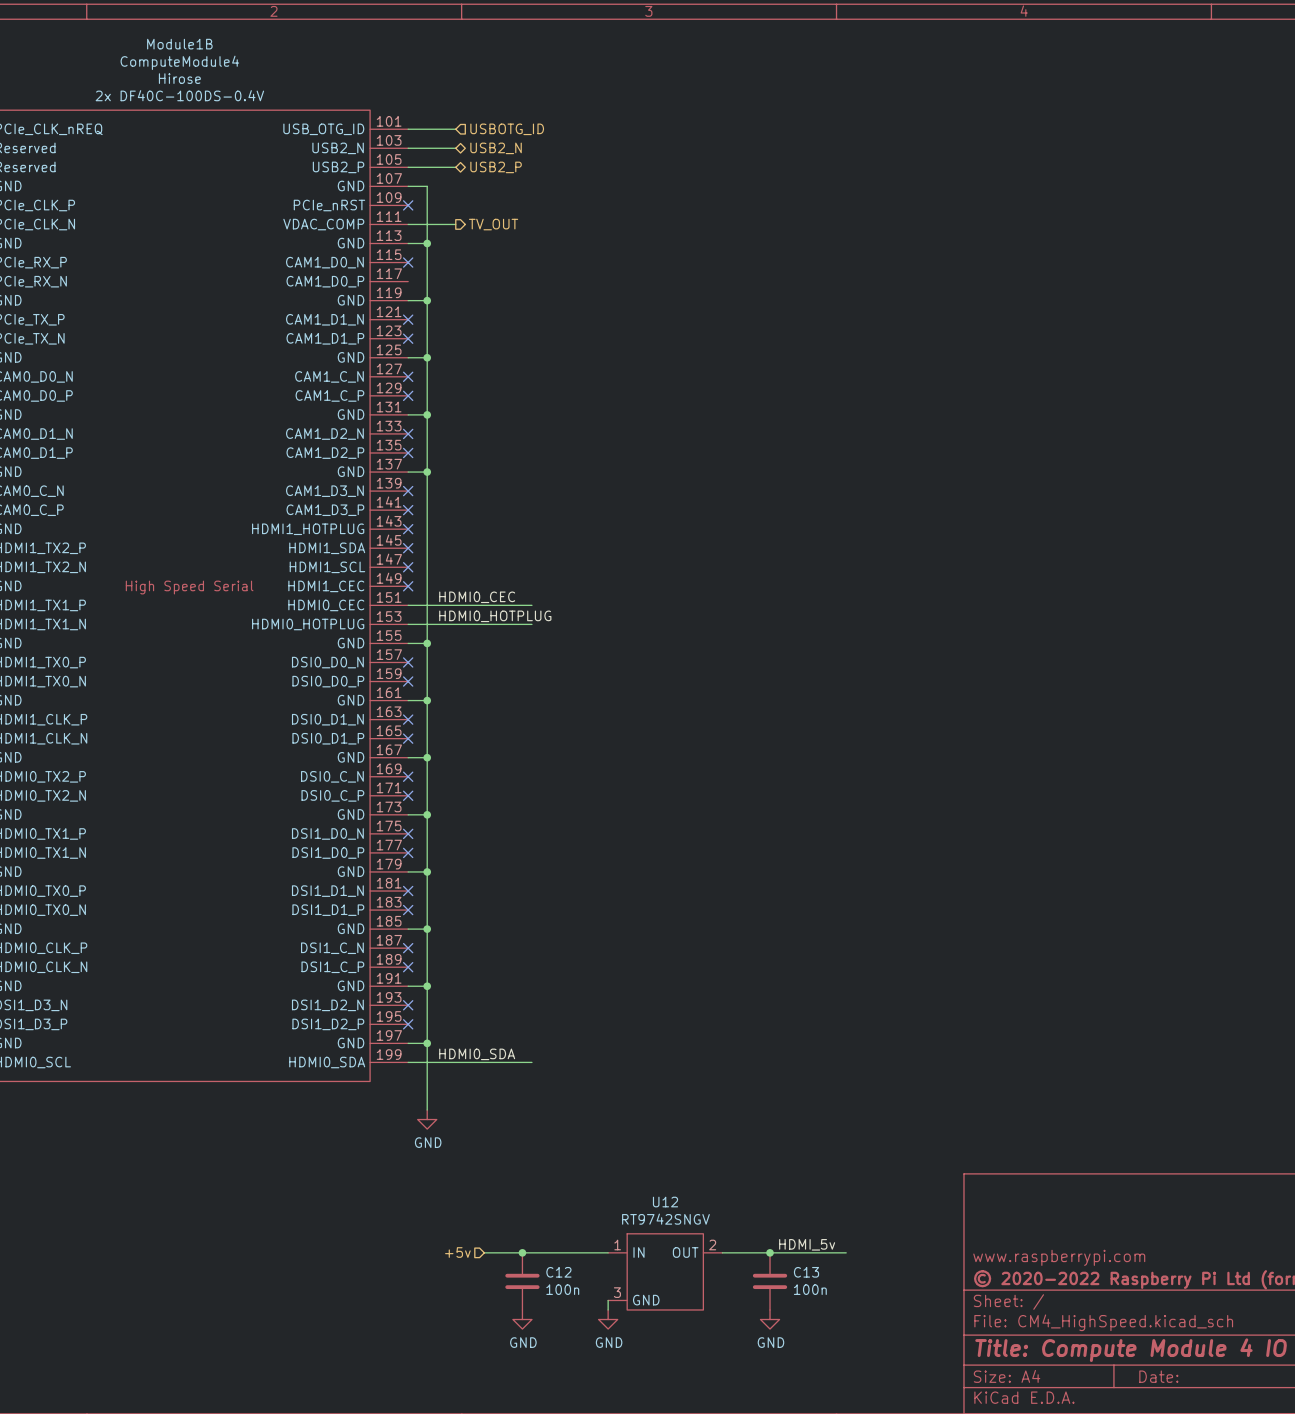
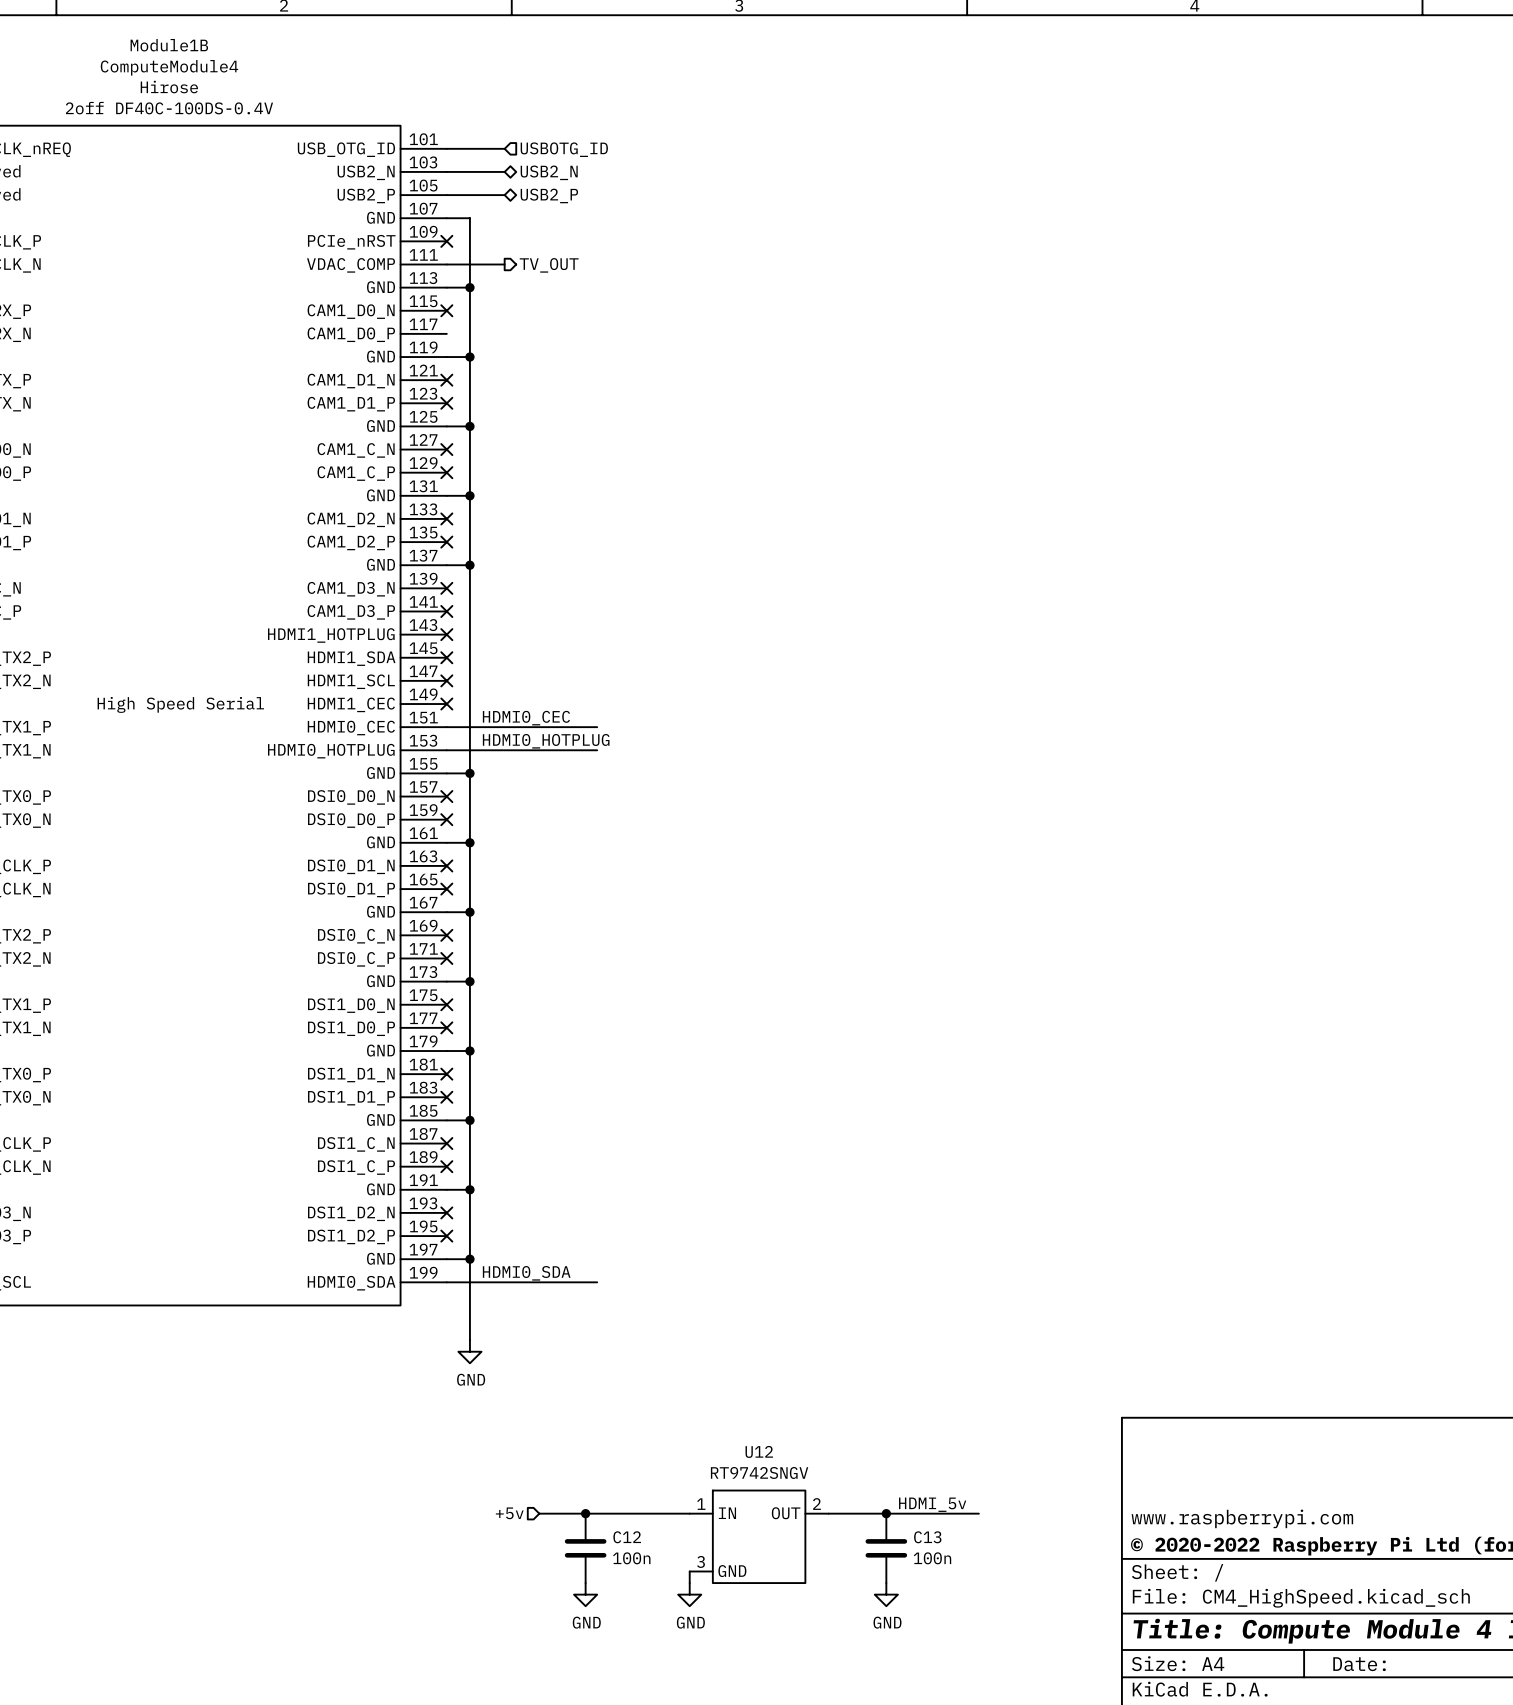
Module1B text: 2x DF40C-100DS-0.4V (179, 95) -> 2off DF40C-100DS-0.4V (169, 108)

